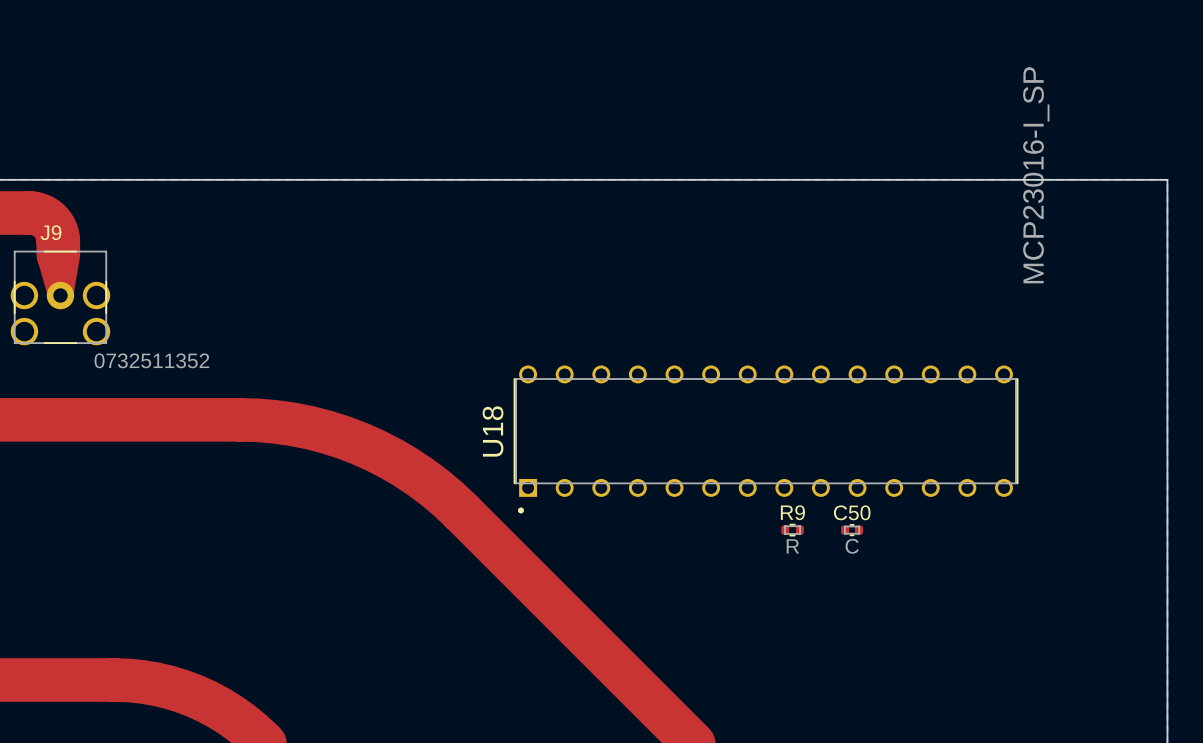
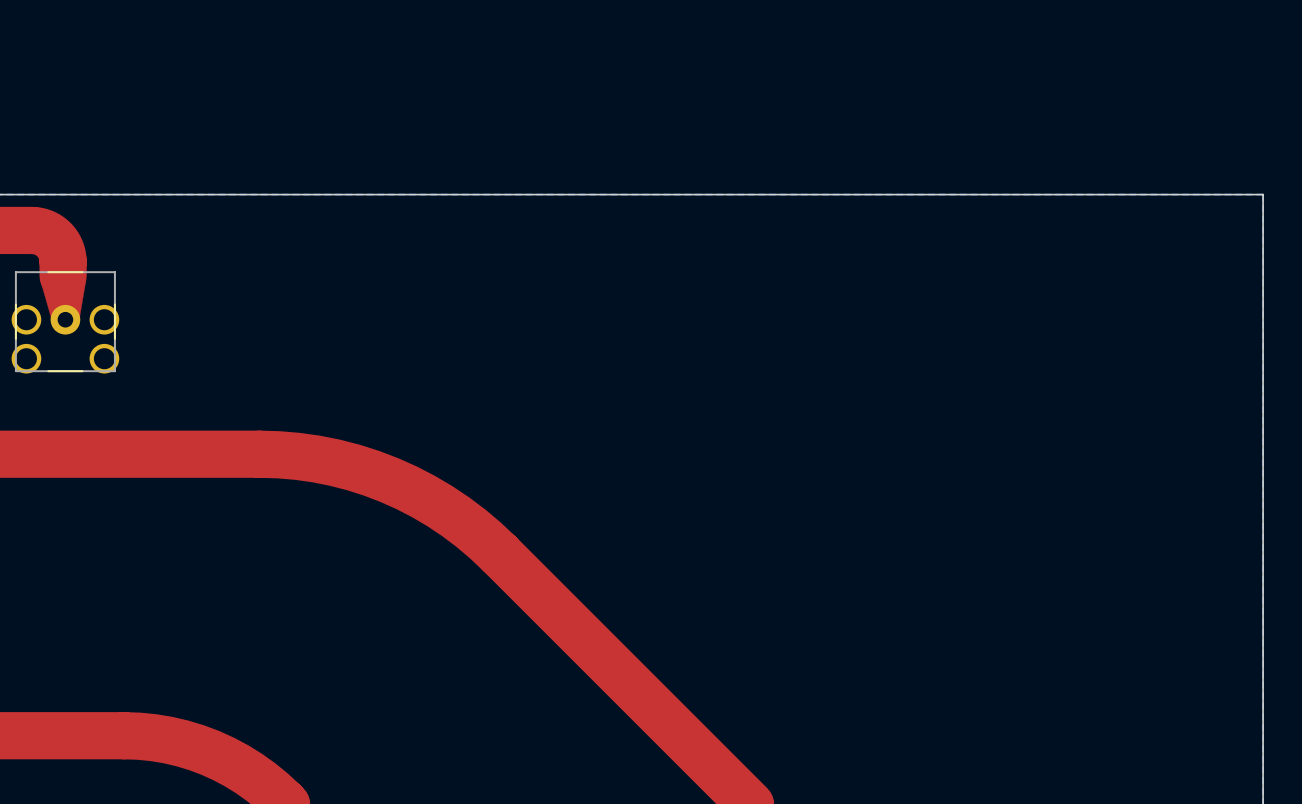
J9 name: J9 (50, 232) -> none
J9 value: 0732511352 (151, 360) -> none
U18: MCP23016-I_SP (766, 439) -> none
R9: R (792, 530) -> none
C50: C (852, 530) -> none

